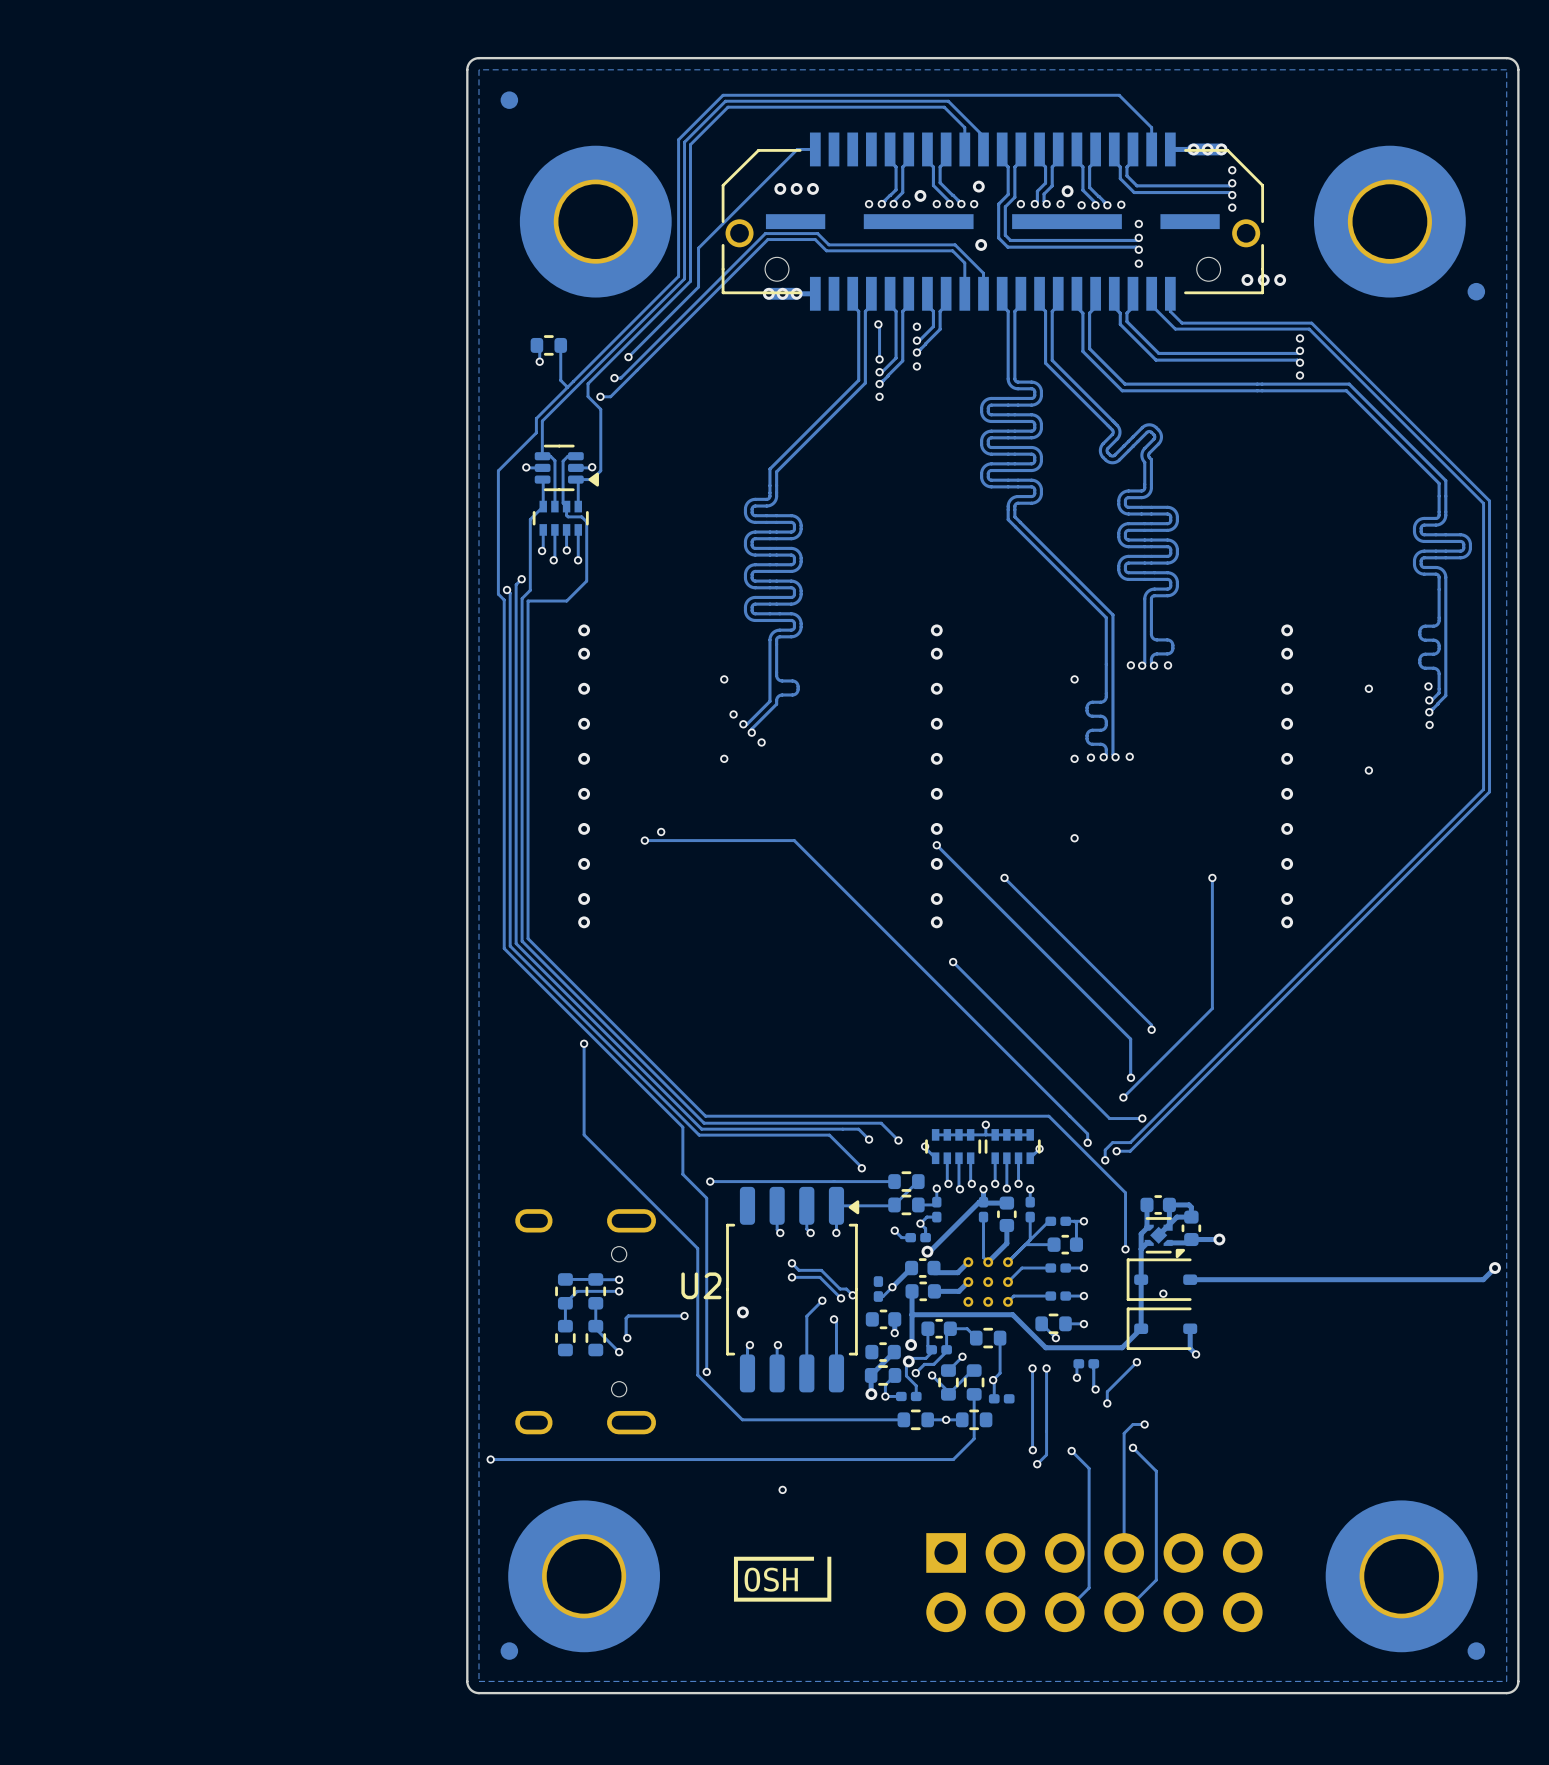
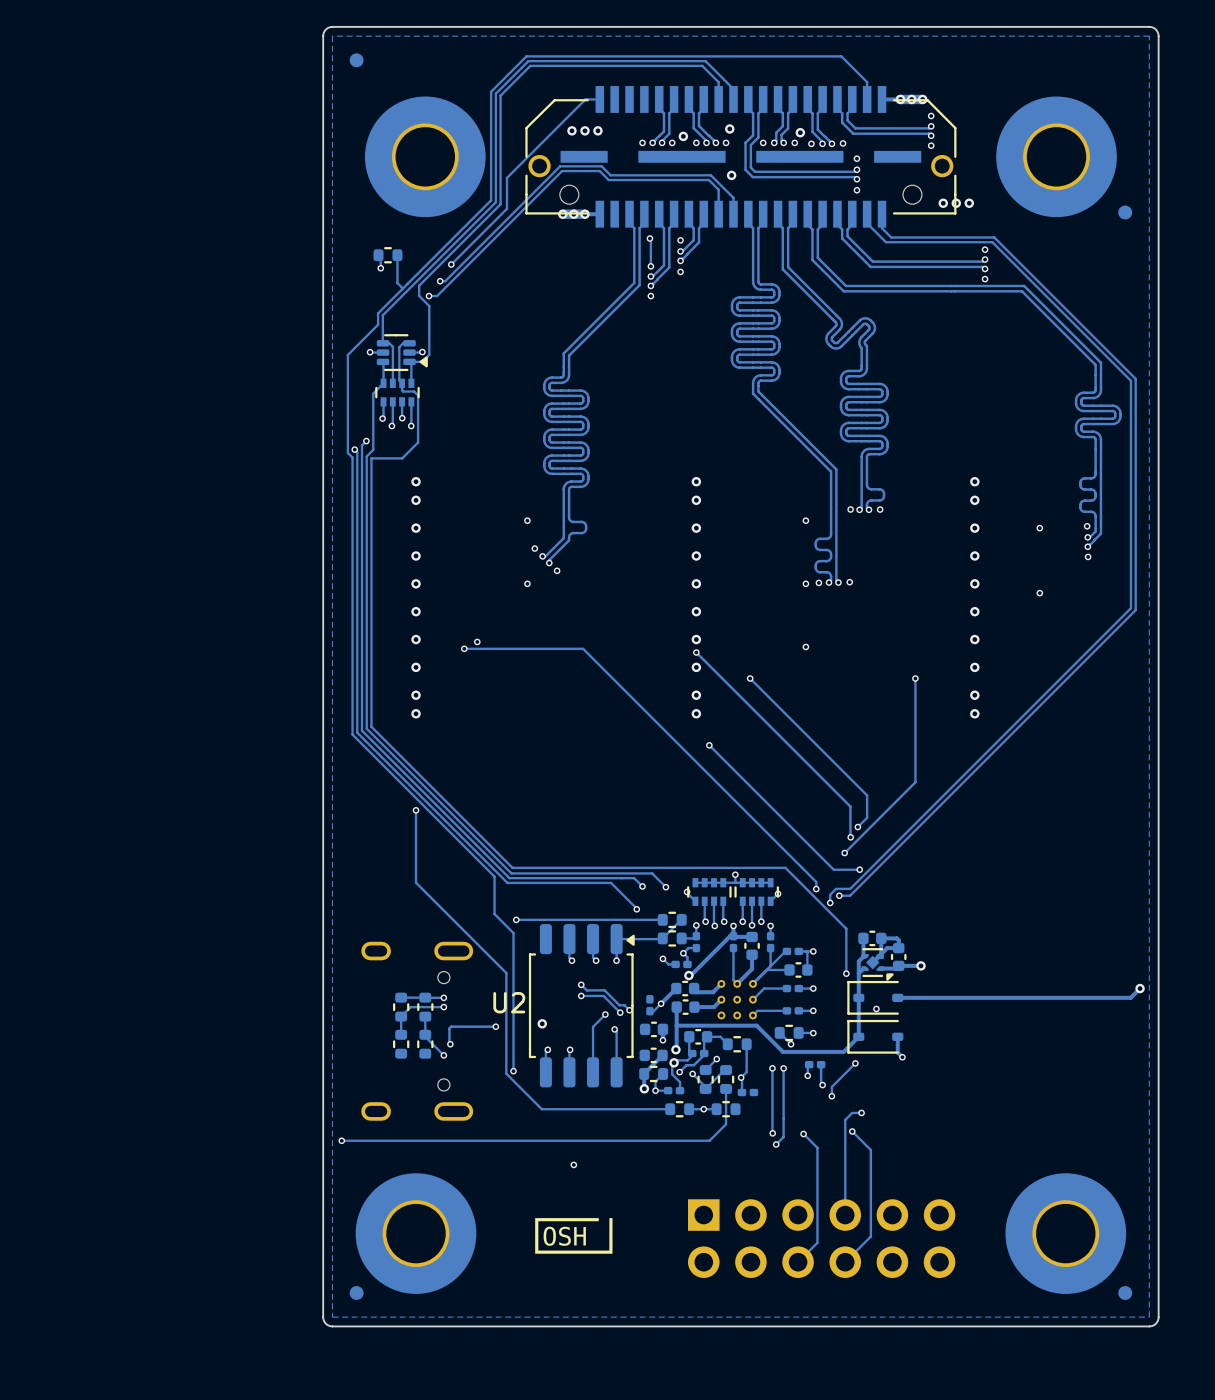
track: none -> (867, 799) (867, 817) (857, 827)
via position: (1151, 1029) -> (857, 827)

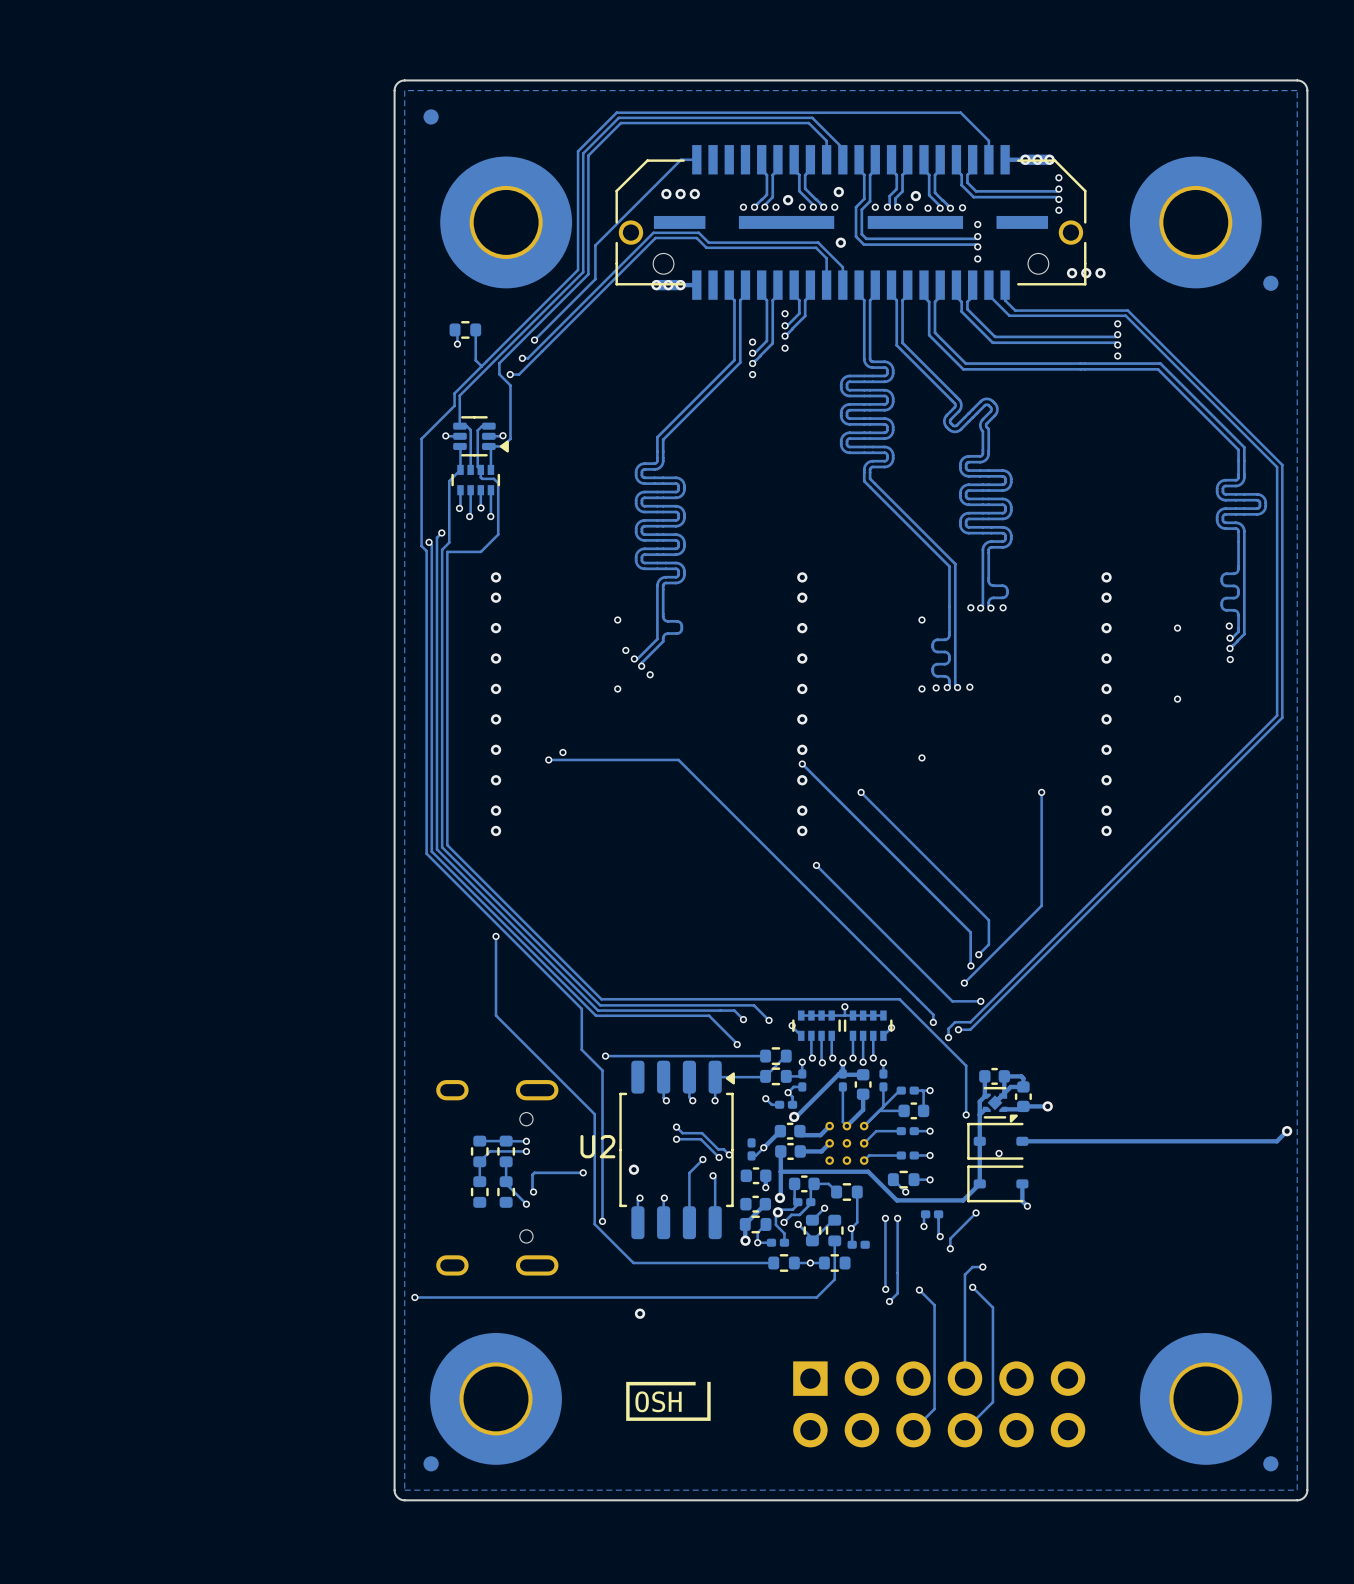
track: (649, 238) (650, 266) -> none
via: (649, 238) -> none
via: none -> (640, 1313)
via: (573, 1164) -> none

